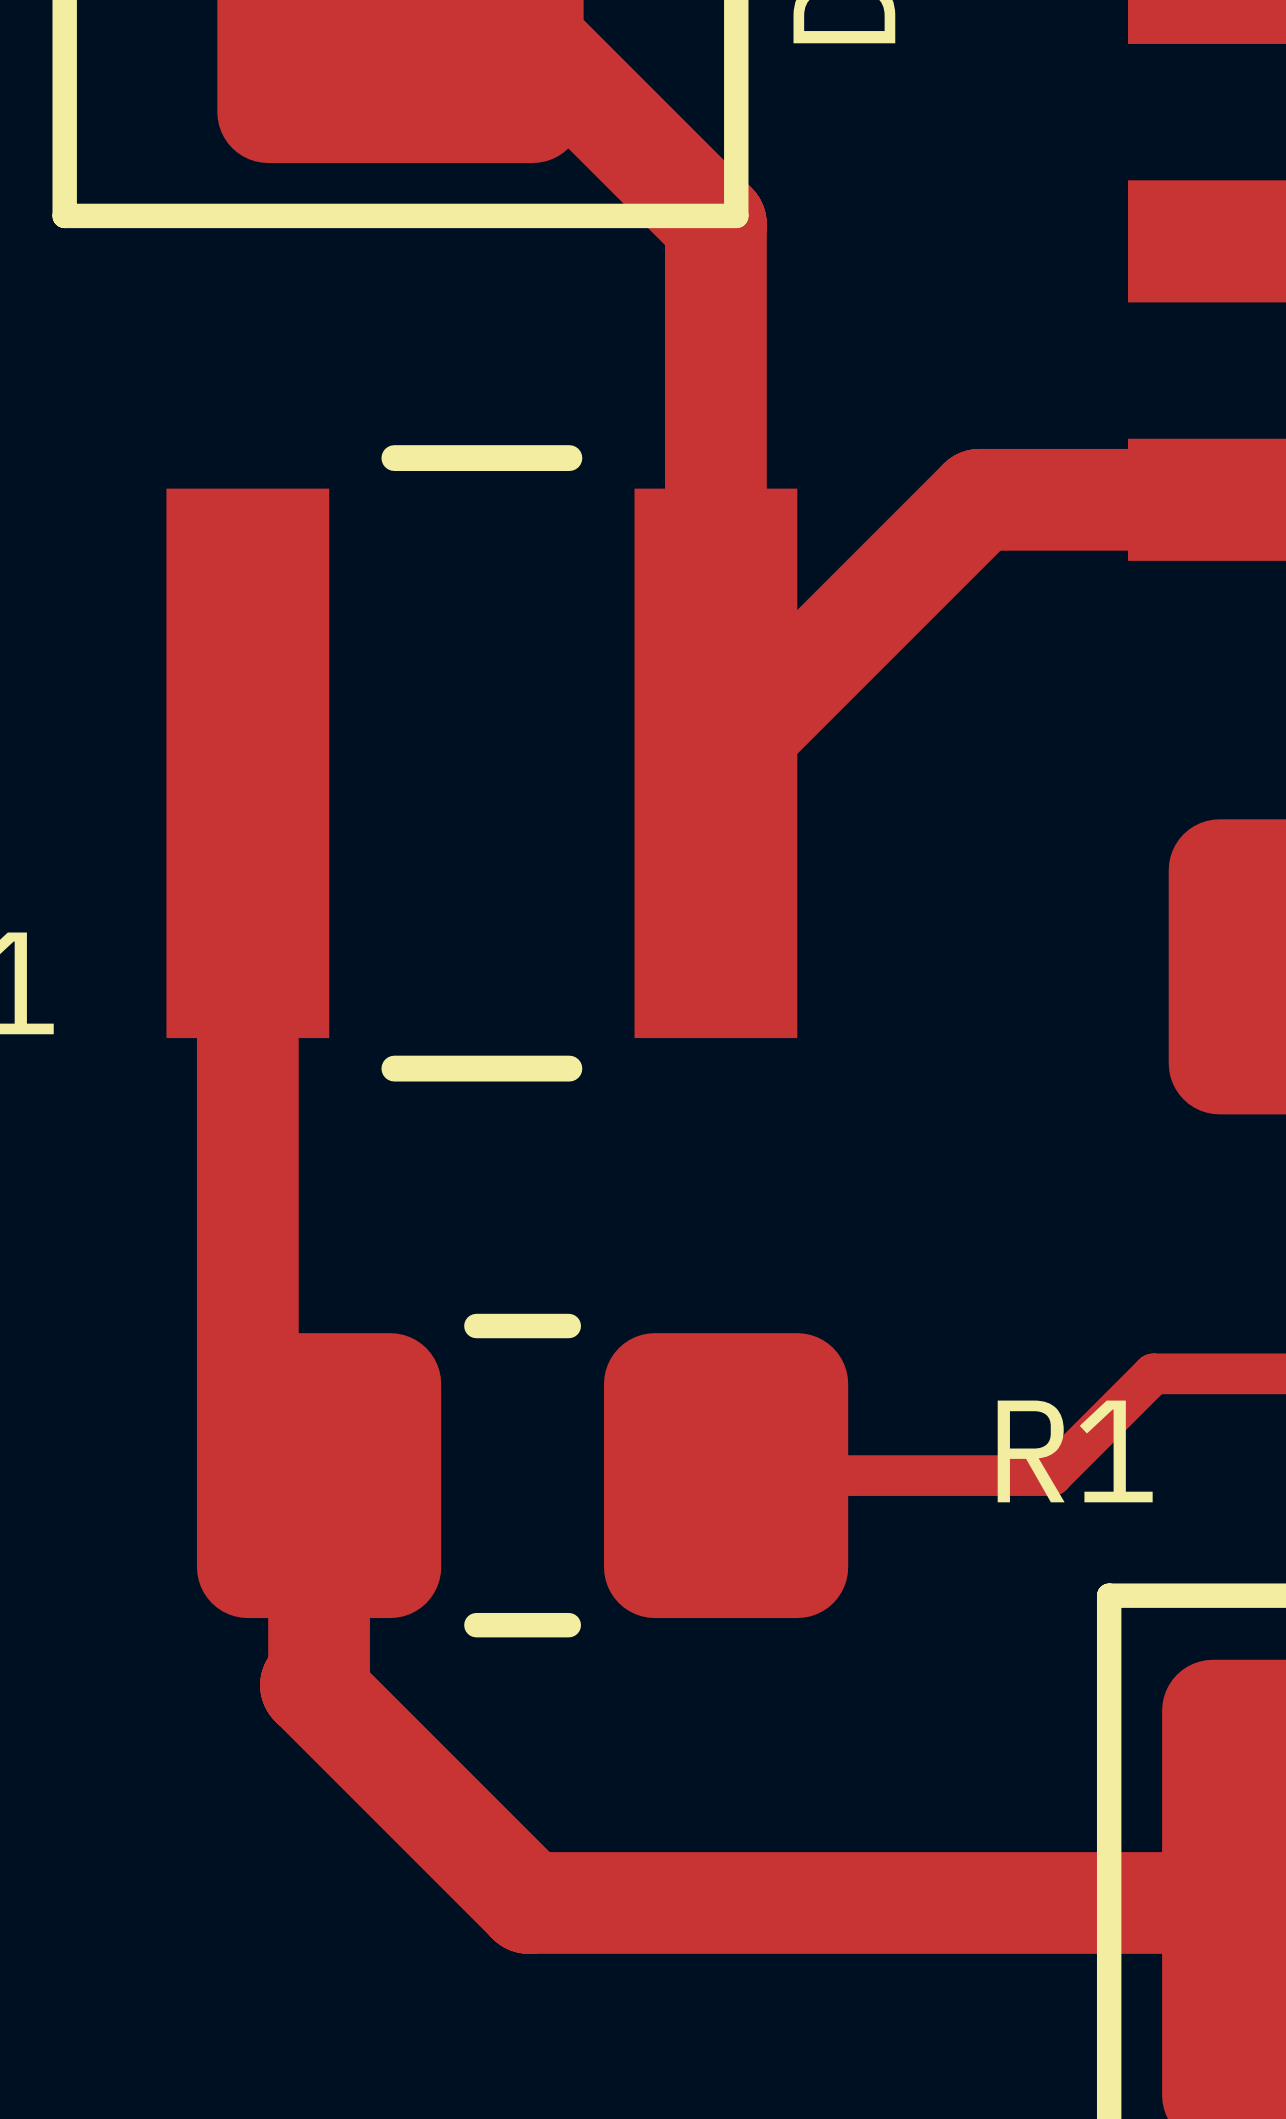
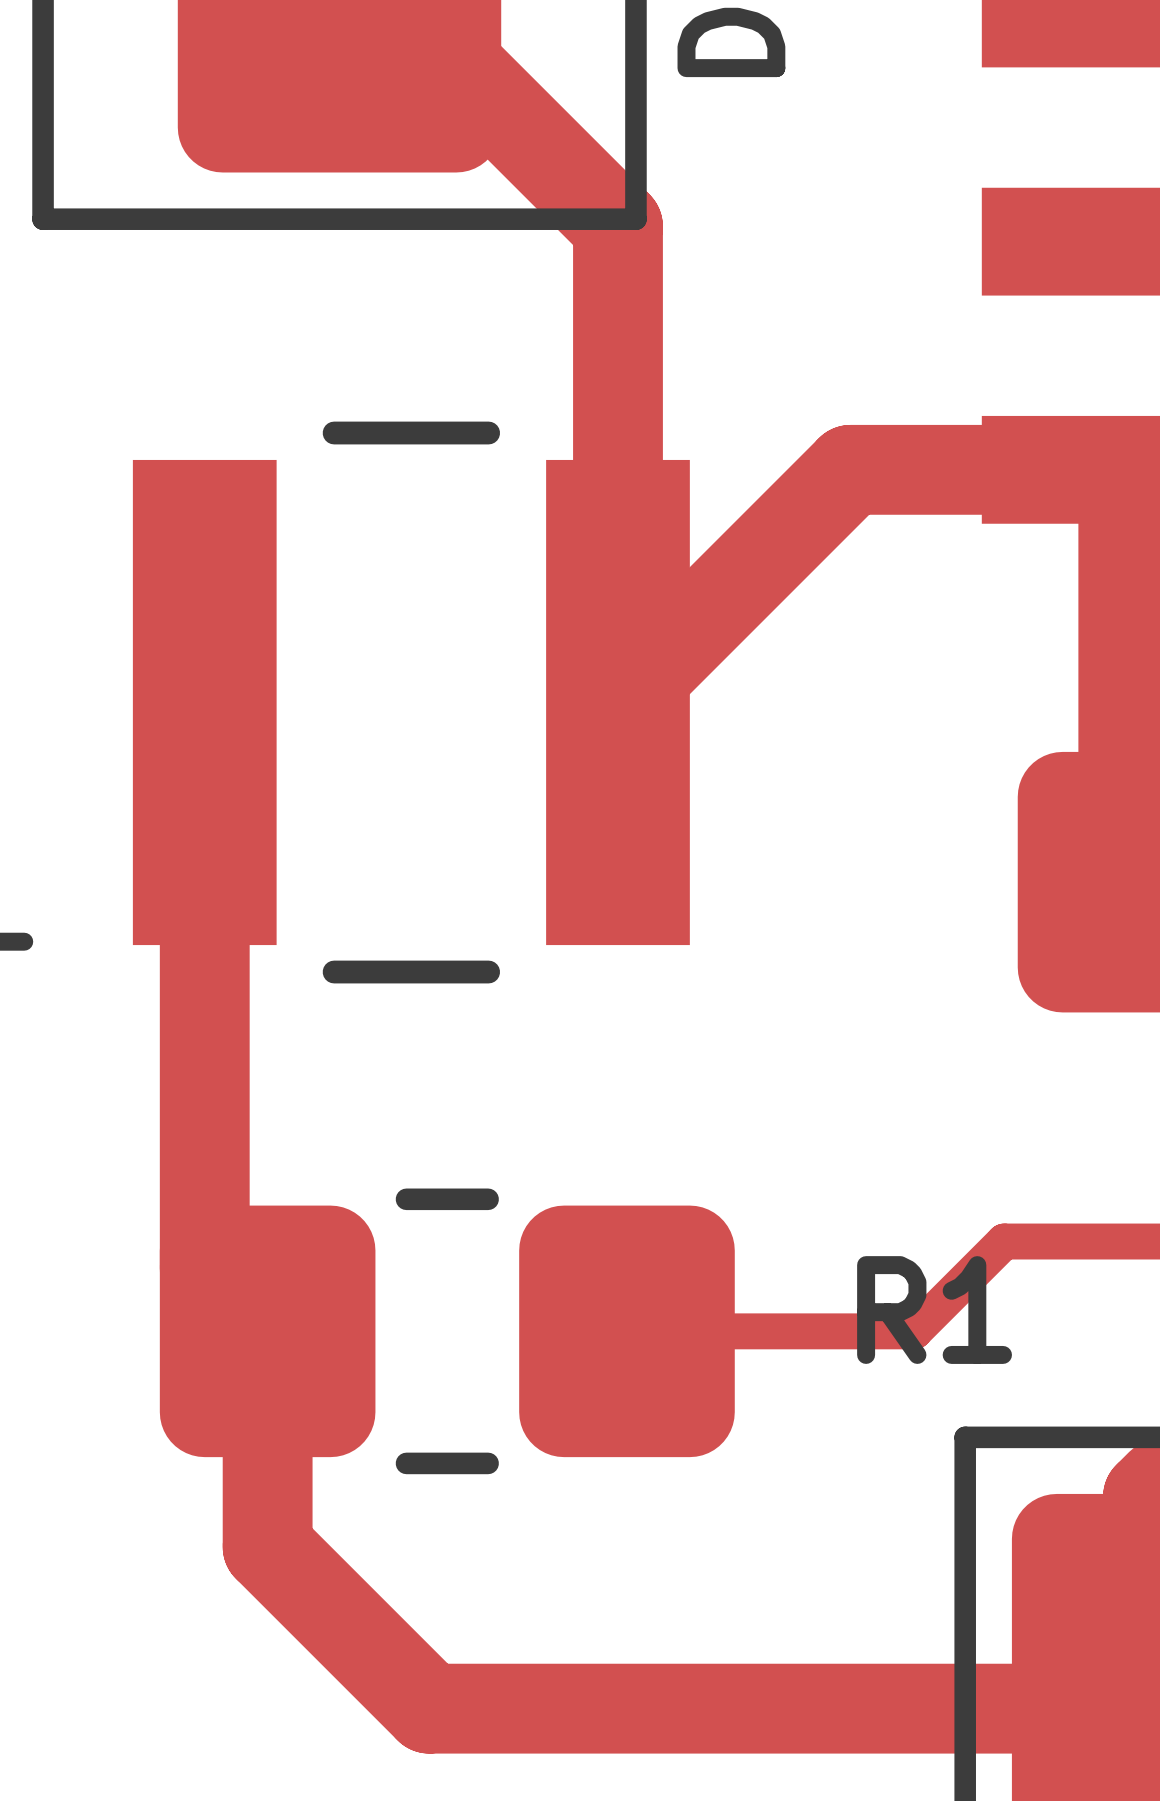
track: (319, 1677) (310, 1685) (528, 1902) -> (267, 1509) (267, 1546) (429, 1708) (452, 1708)

